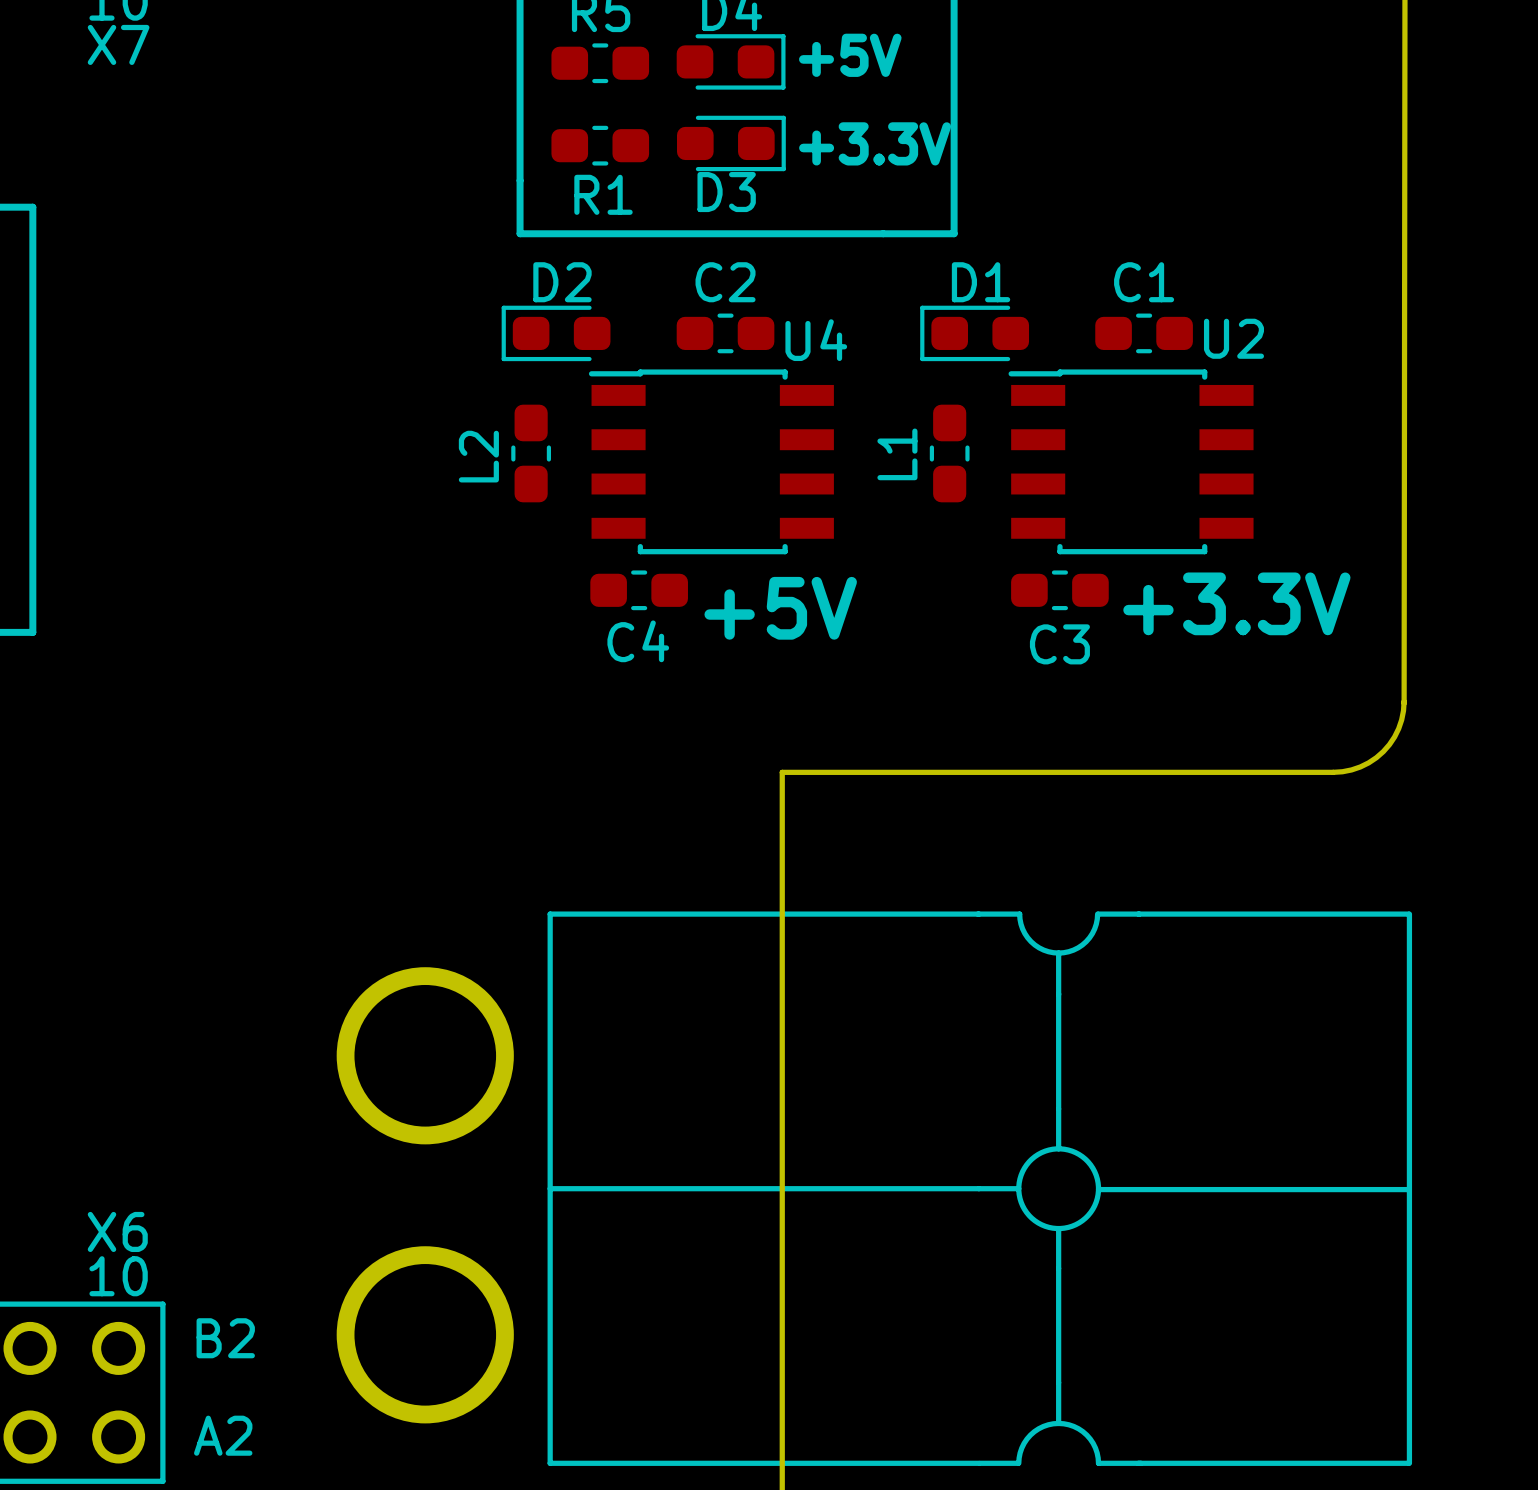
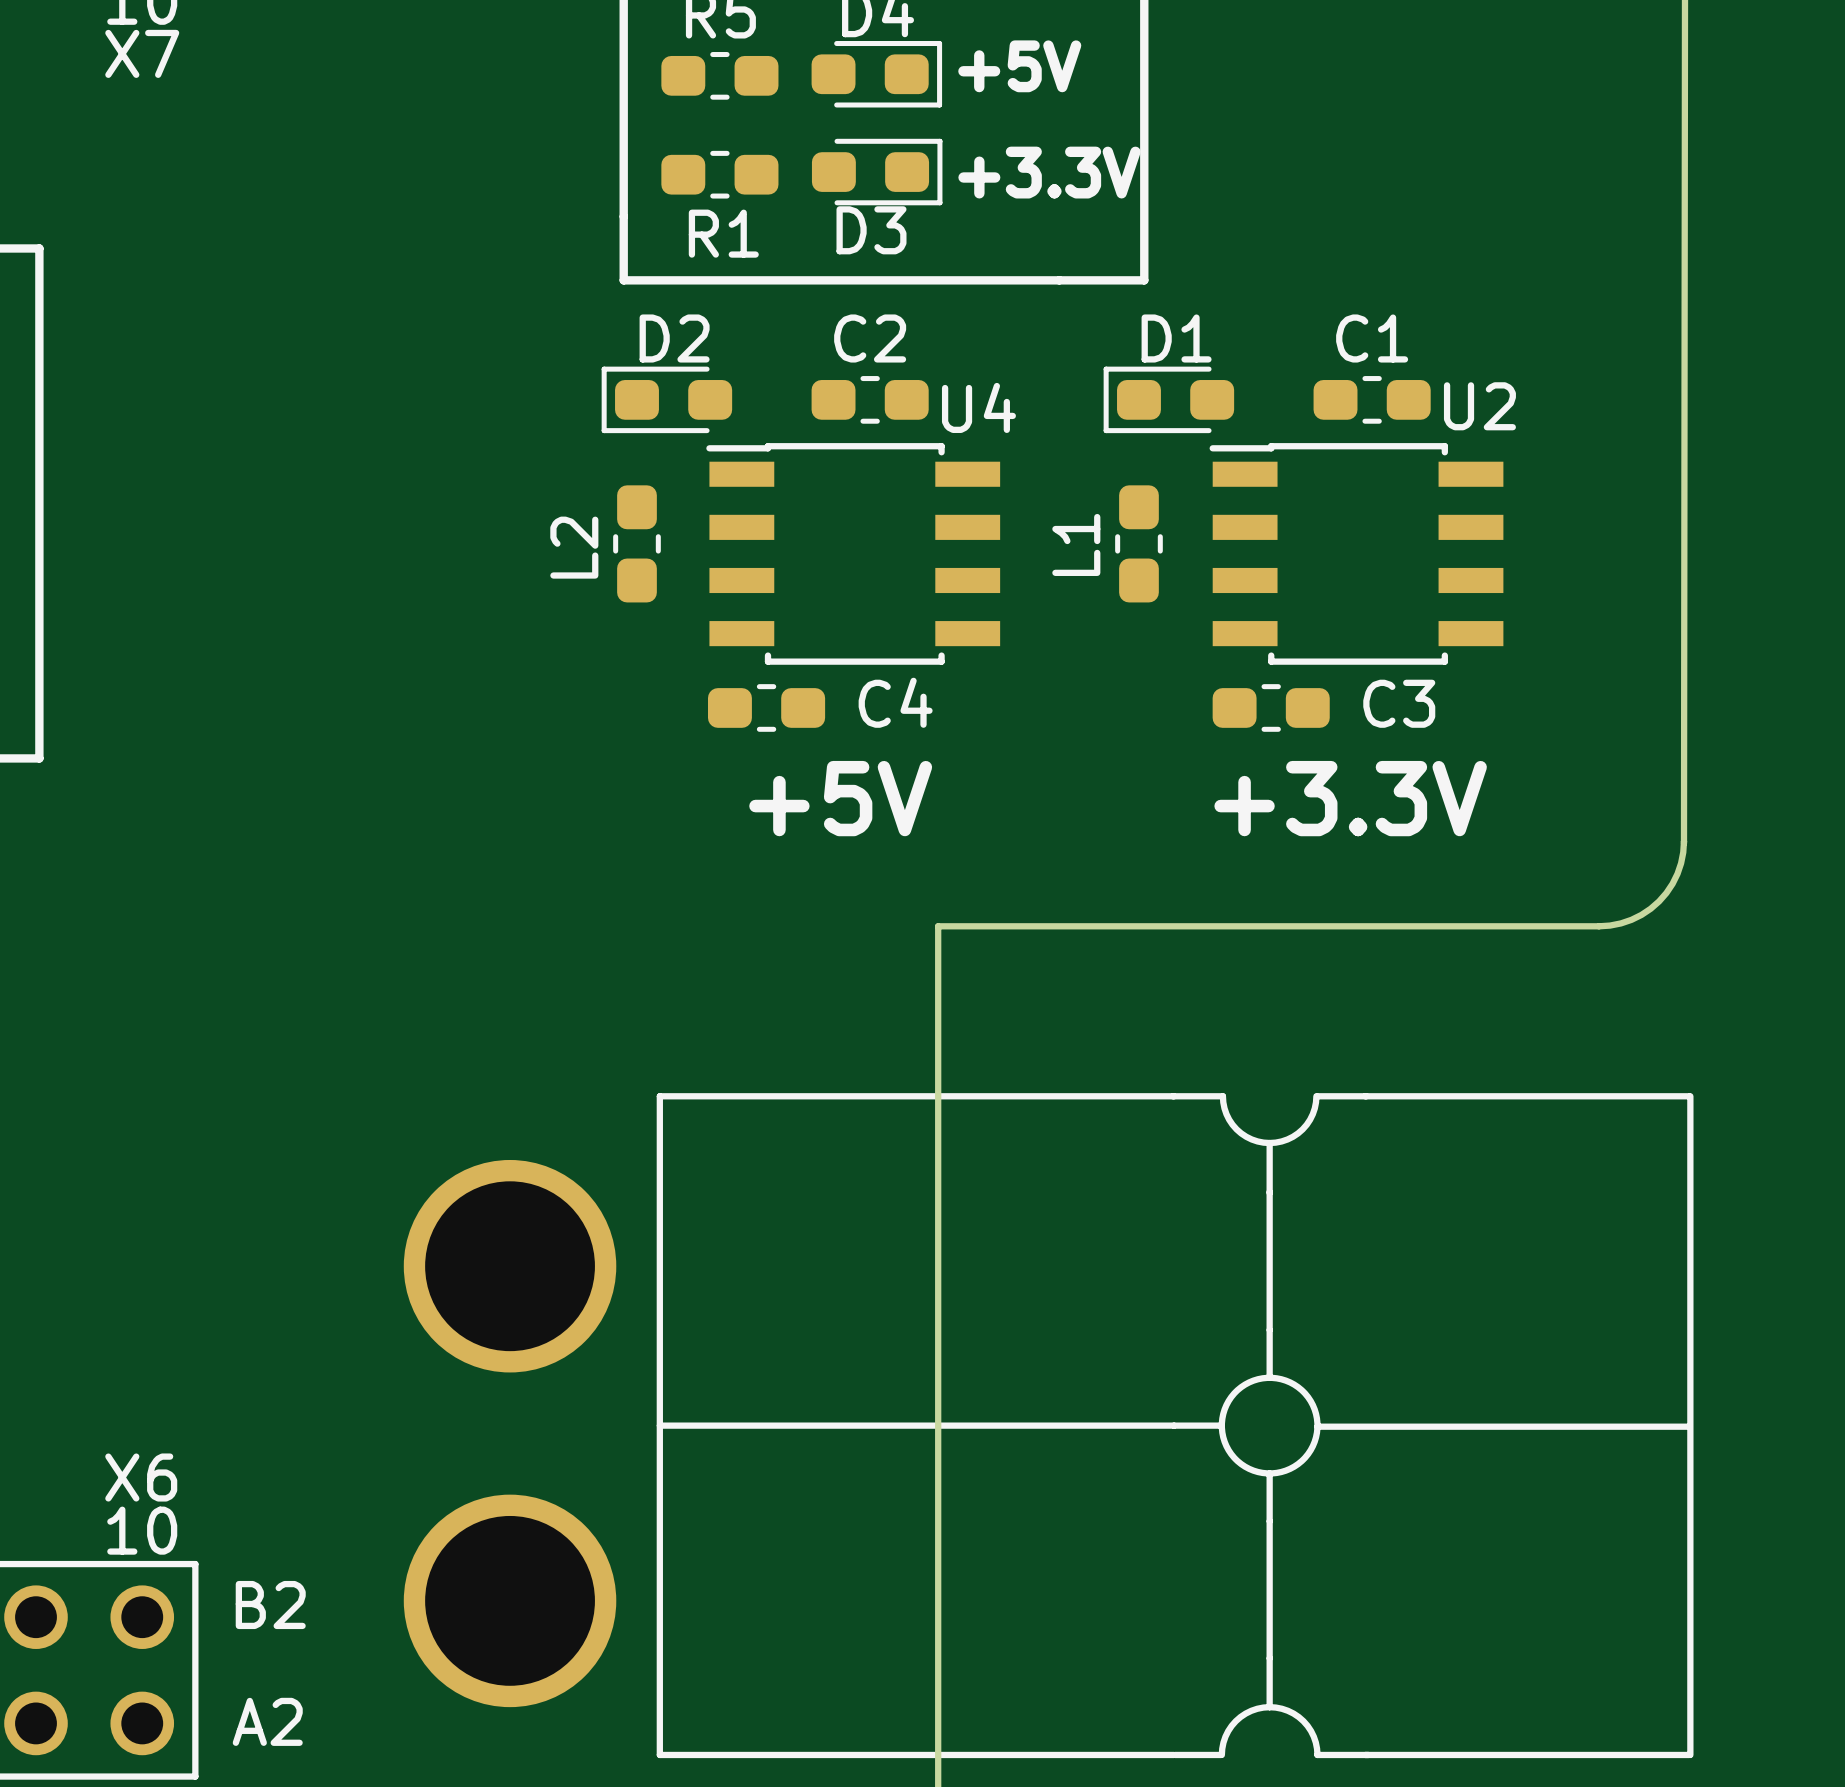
text position: +3.3V (1236, 603) -> +3.3V (1350, 798)
text position: +5V (780, 608) -> +5V (840, 798)
C4 name position: C4 (638, 641) -> C4 (895, 702)
C3 name position: C3 (1059, 644) -> C3 (1399, 703)

